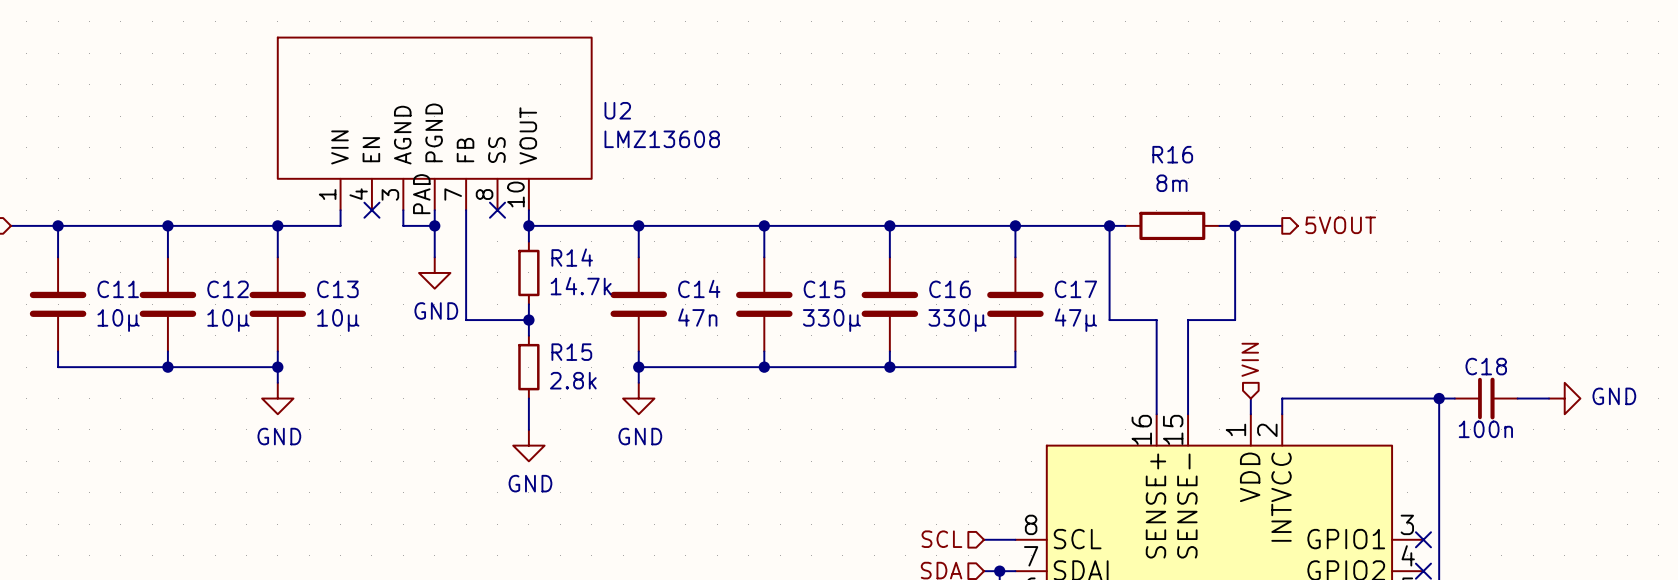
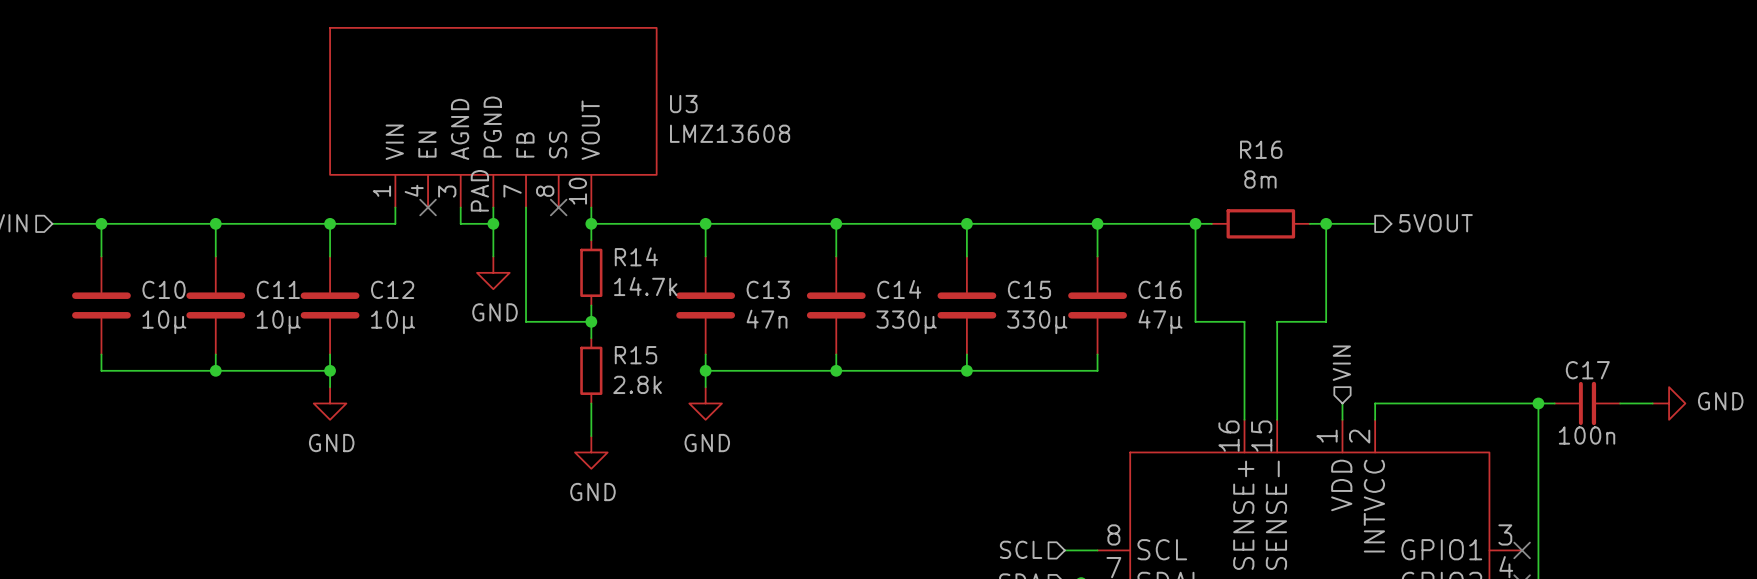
U2 name: U2 (617, 110) -> U3 (683, 104)
C14 name: C14 (699, 288) -> C13 (768, 289)
C11 name: C11 (118, 289) -> C10 (164, 289)
C12 name: C12 (228, 289) -> C11 (278, 289)
C13 name: C13 (337, 289) -> C12 (392, 289)
C15 name: C15 (824, 289) -> C14 (899, 289)
C16 name: C16 (949, 289) -> C15 (1029, 289)
C17 name: C17 (1075, 289) -> C16 (1160, 289)
C18 name: C18 (1486, 366) -> C17 (1587, 370)

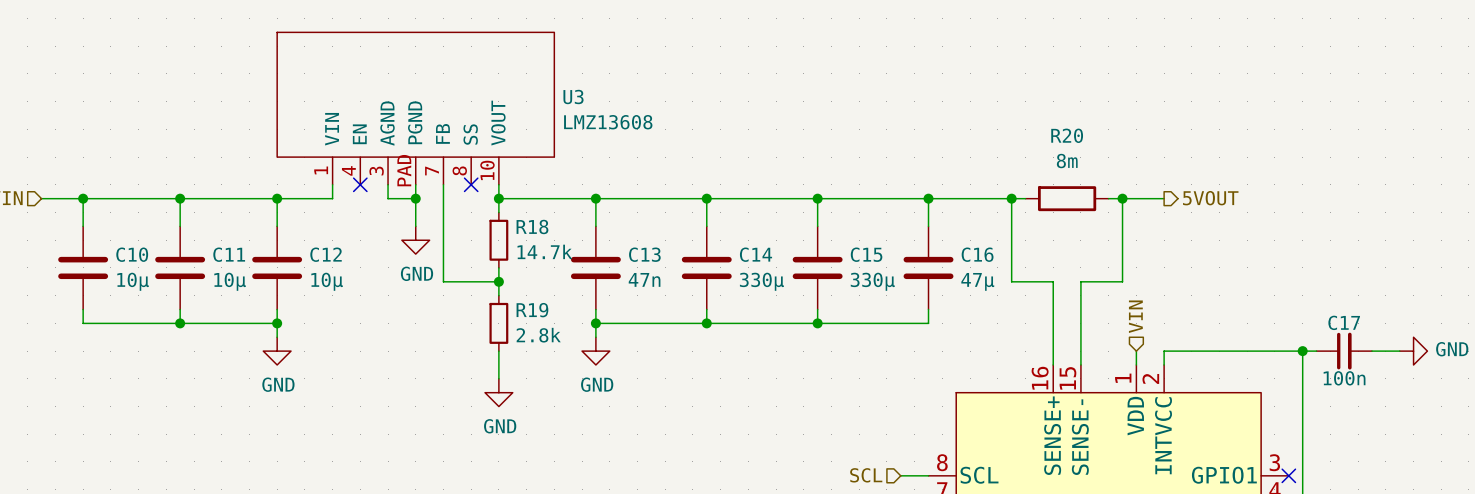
R16 name: R16 (1261, 149) -> R20 (1067, 135)
R14 name: R14 (636, 256) -> R18 (532, 226)
R15 name: R15 (636, 355) -> R19 (532, 310)

